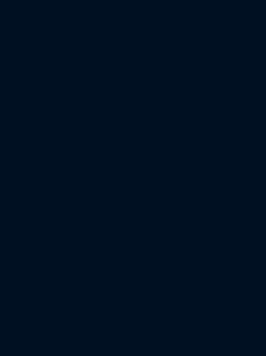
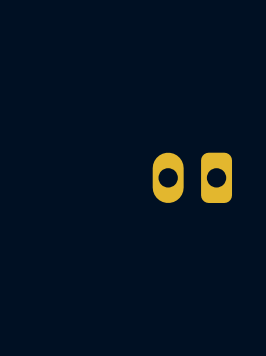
part: none -> (192, 177)

